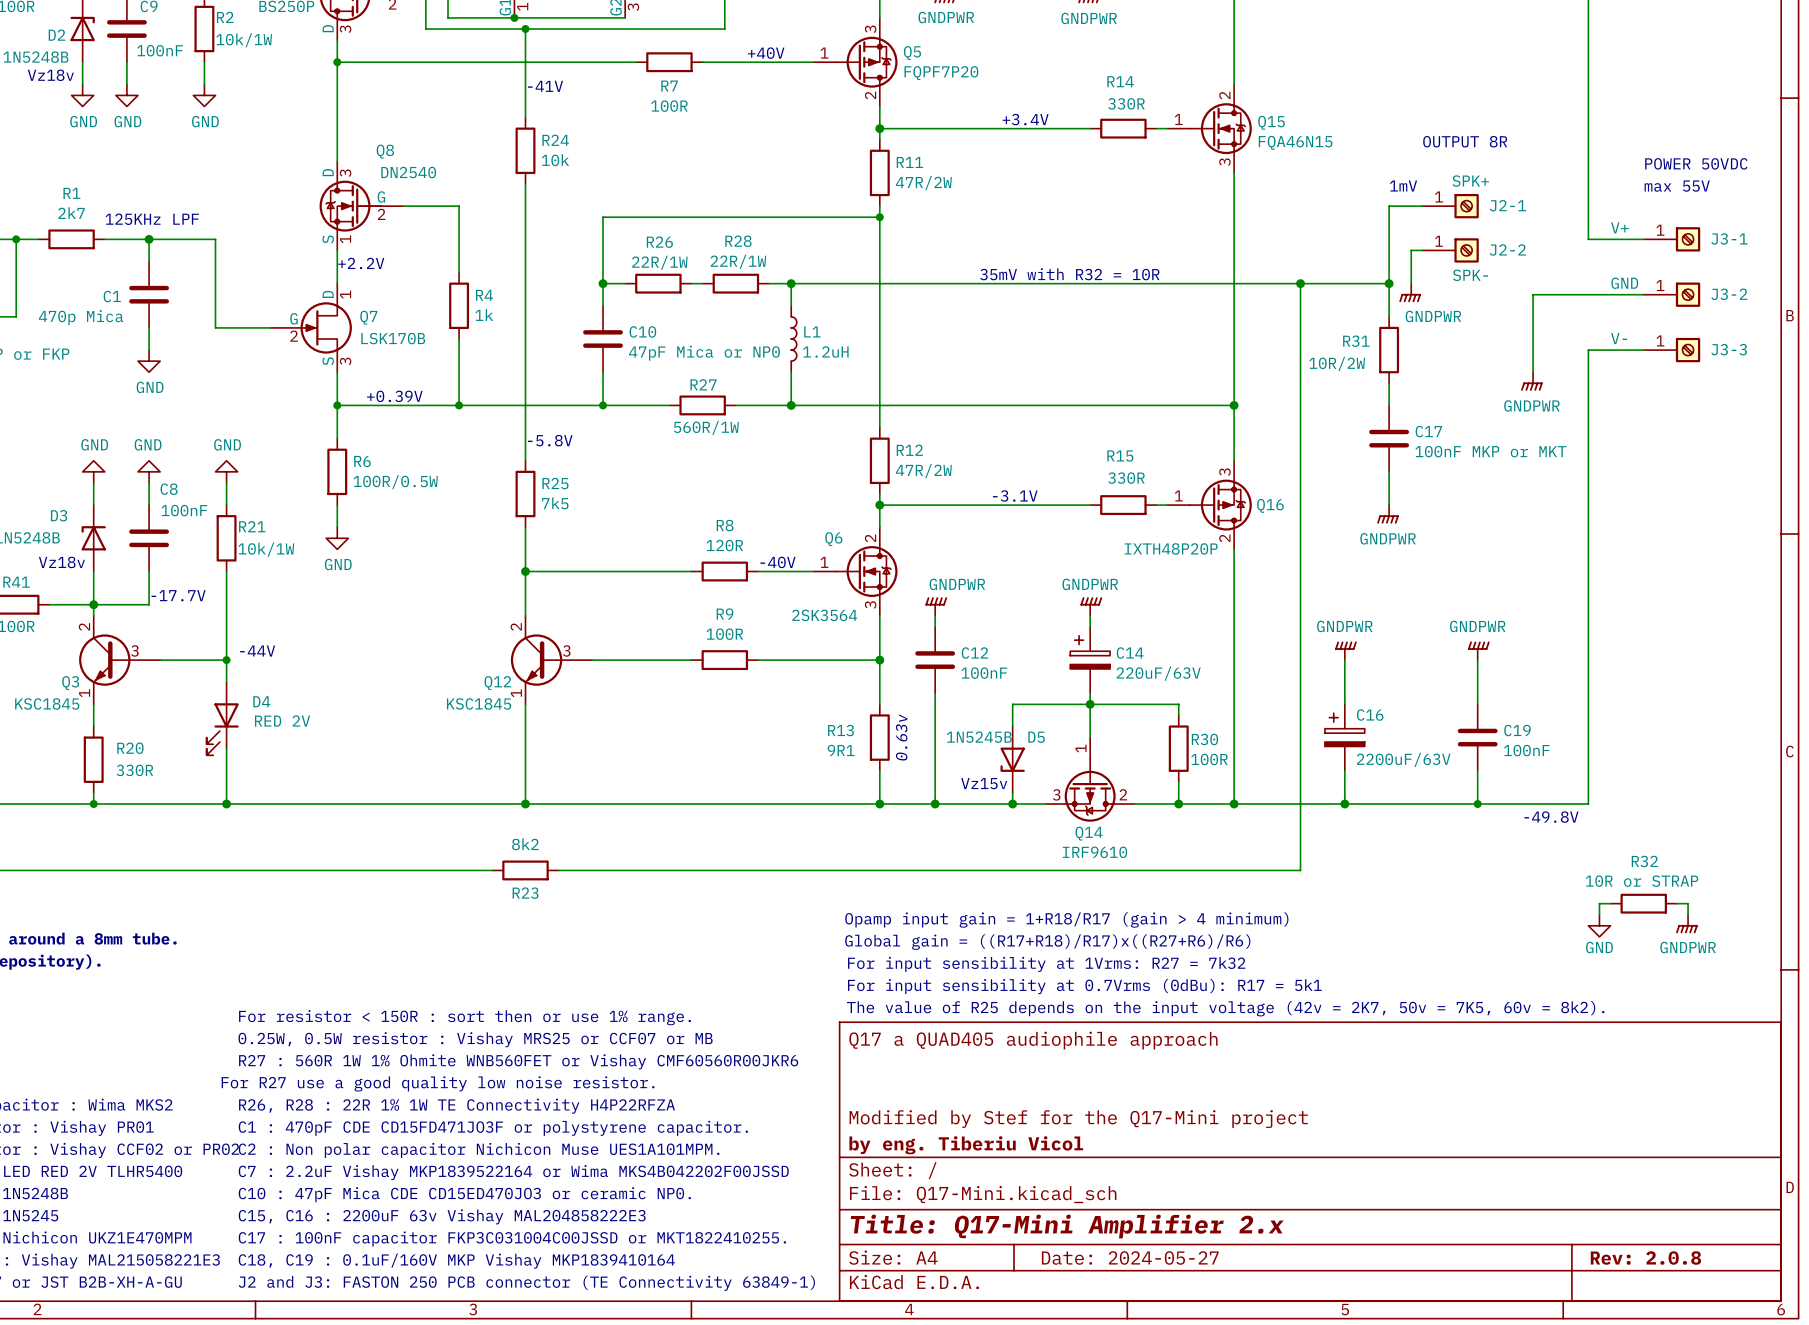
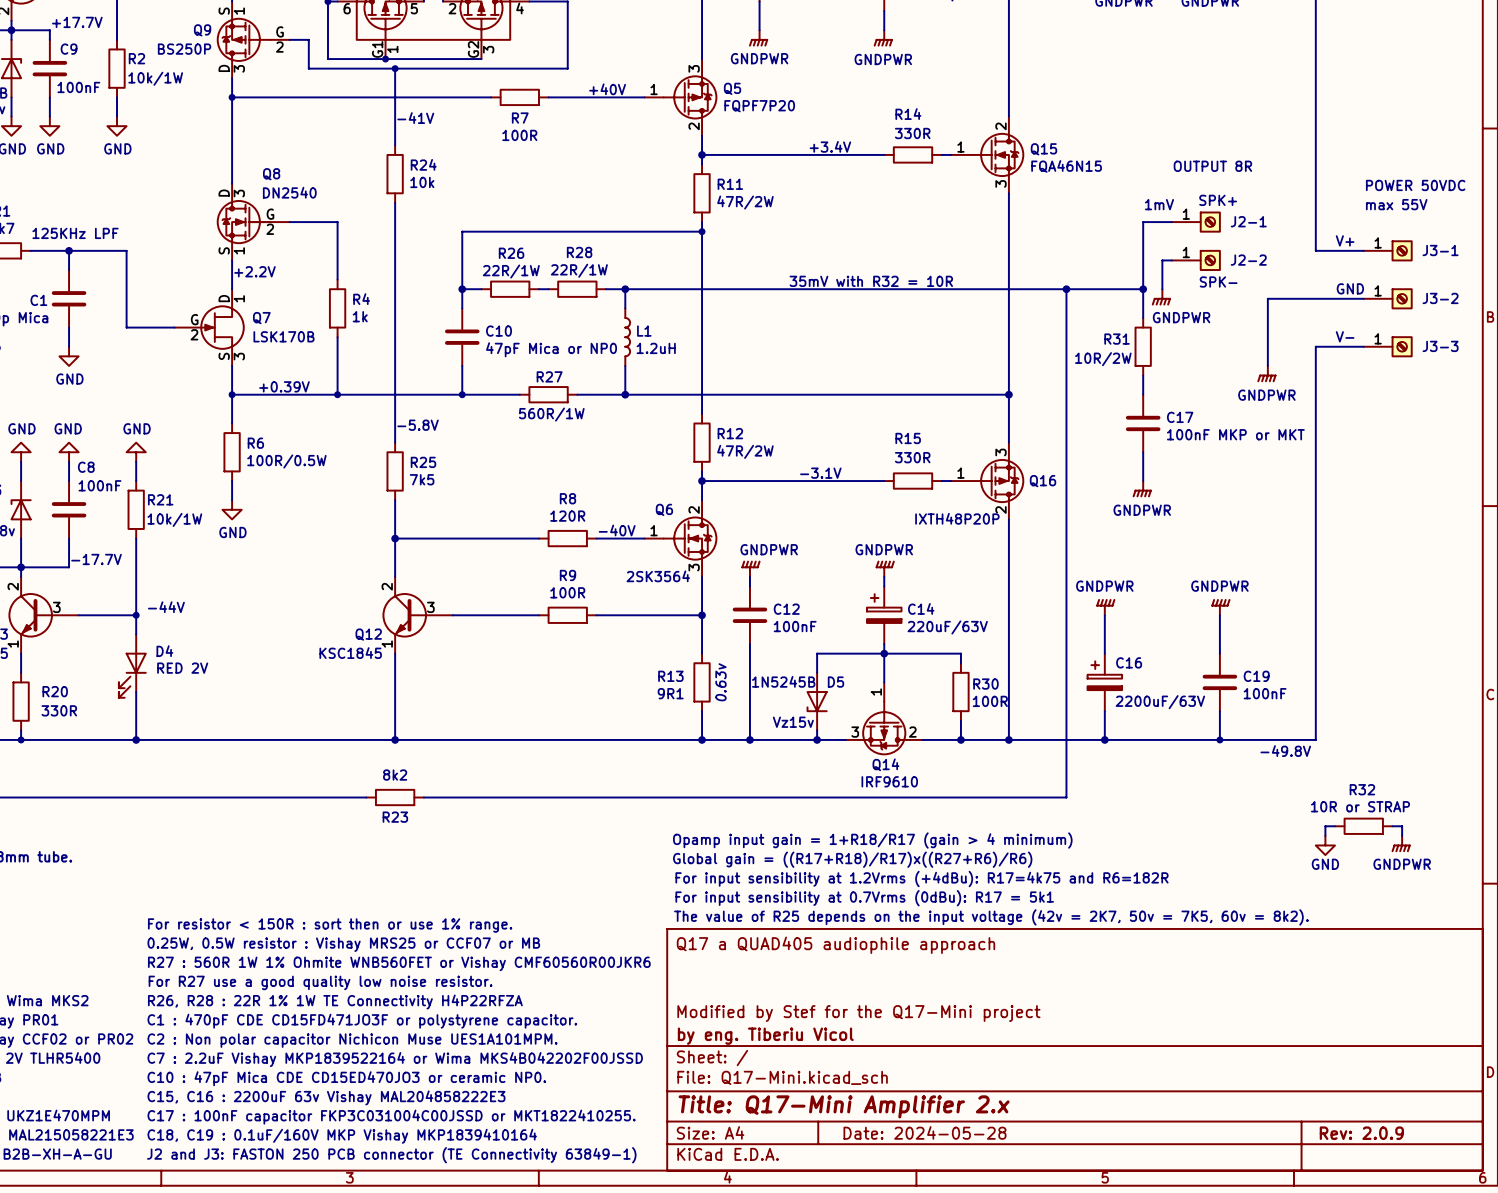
text: For input sensibility at 1Vrms: R27 = 7k32 (1046, 964) -> For input sensibility at 1.2Vrms (+4dBu): R17=4k75 and R6=182R (921, 879)
title block: Date: 2024-05-27 (1130, 1257) -> Date: 2024-05-28 (924, 1132)
title block: Rev: 2.0.8 (1645, 1257) -> Rev: 2.0.9 (1361, 1133)

